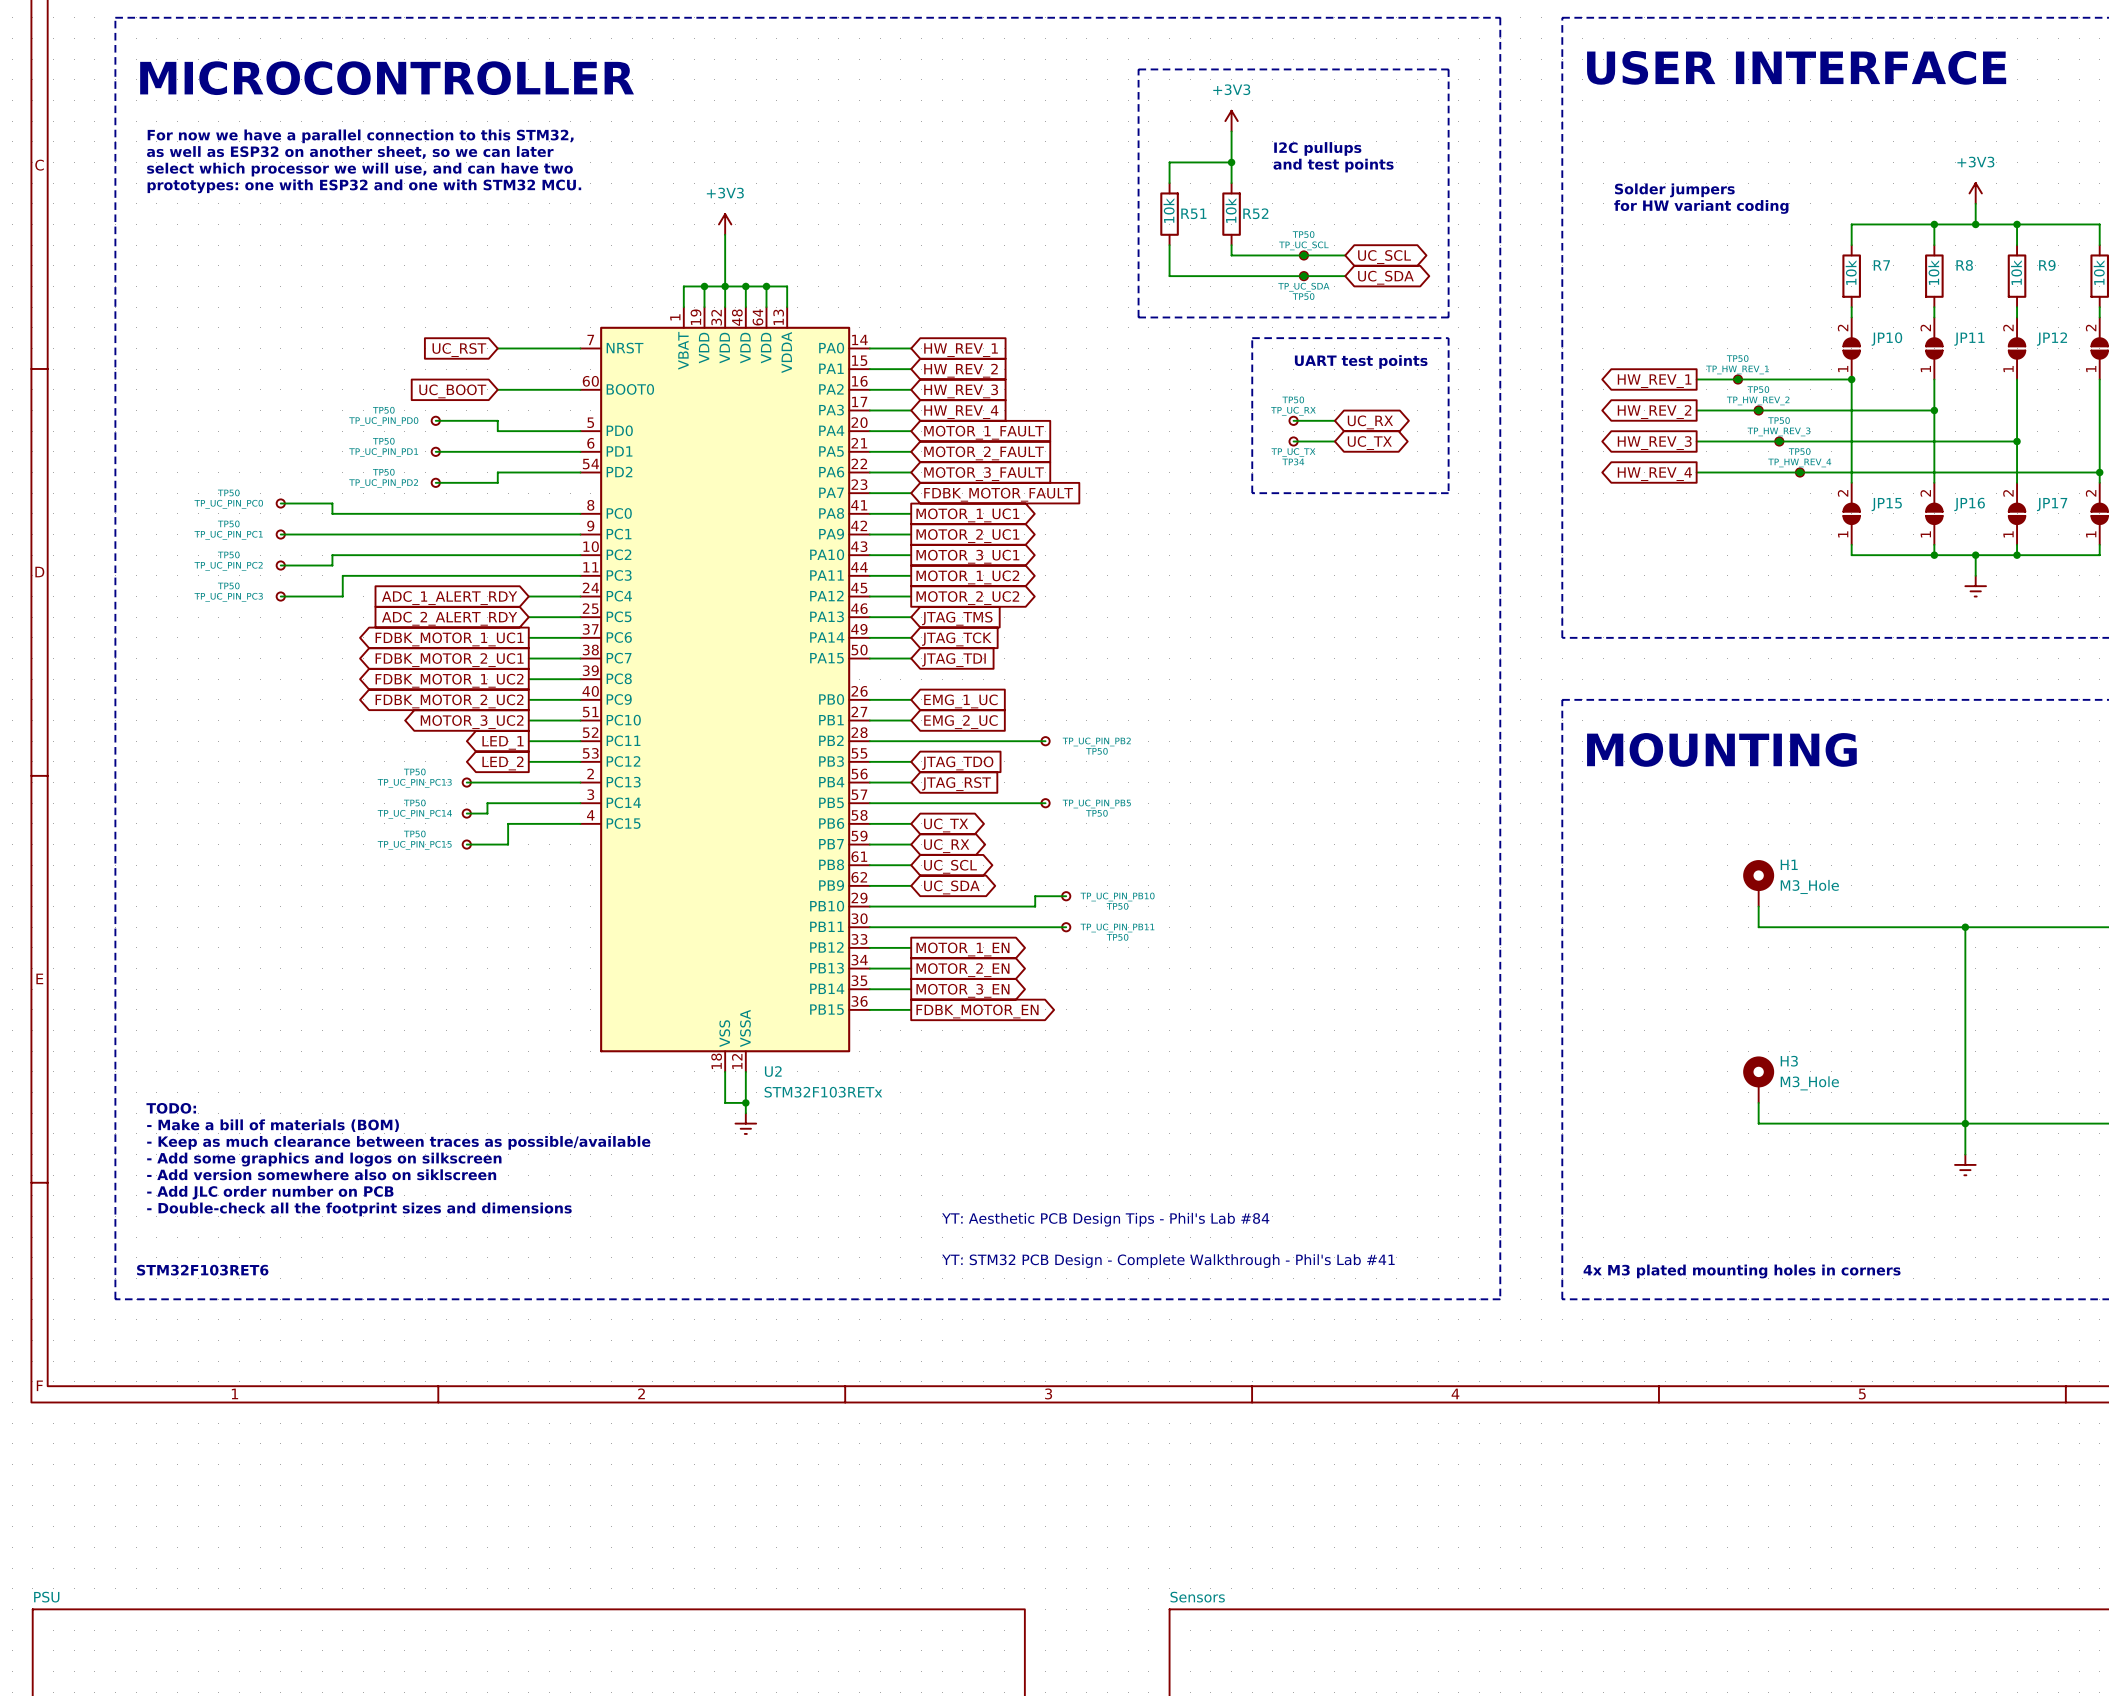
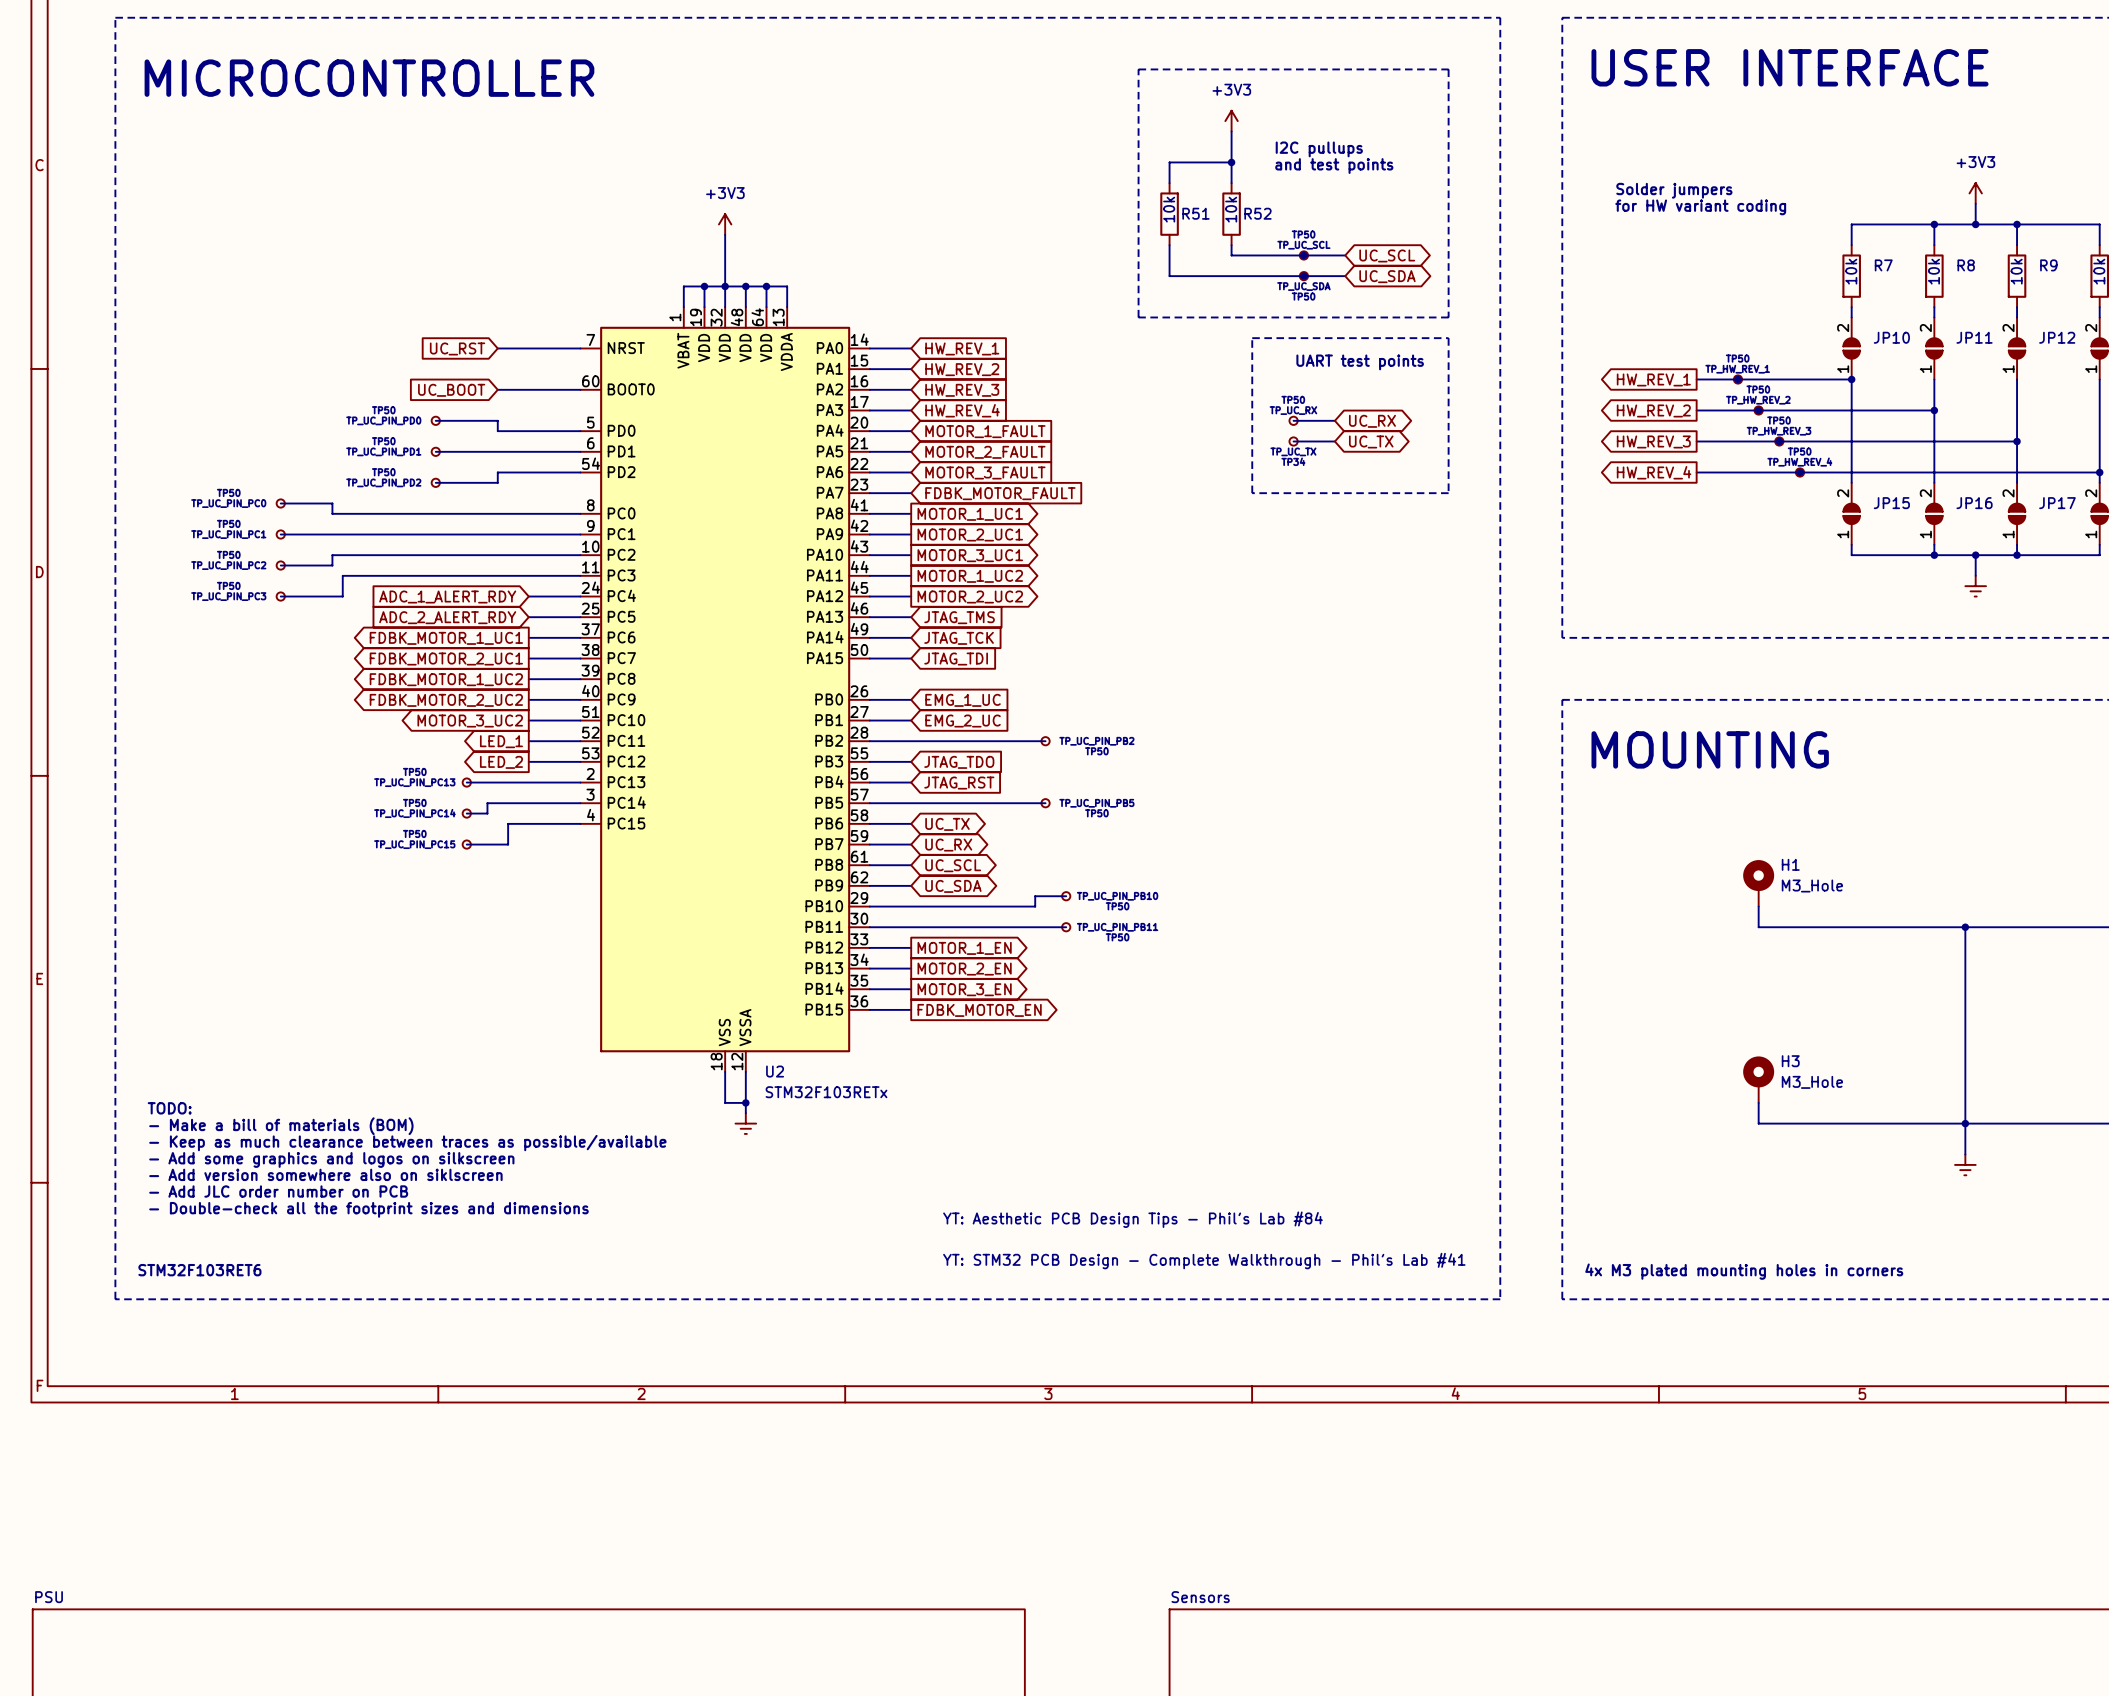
text: For now we have a parallel connection to this STM32, (360, 136) -> none
text: as well as ESP32 on another sheet, so we can later (350, 152) -> none
text: select which processor we will use, and can have two (359, 169) -> none
text: prototypes: one with ESP32 and one with STM32 MCU. (364, 186) -> none

